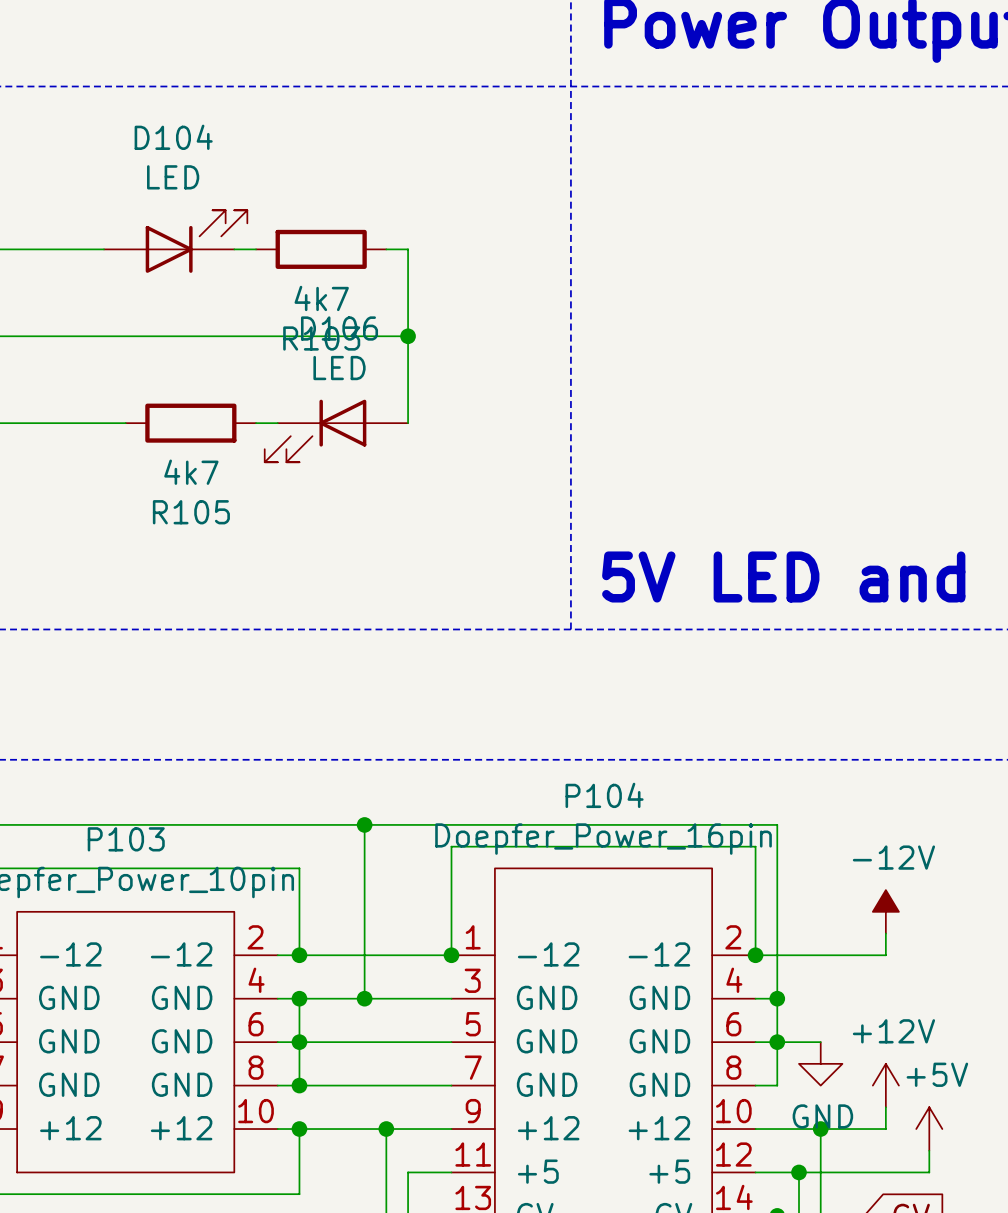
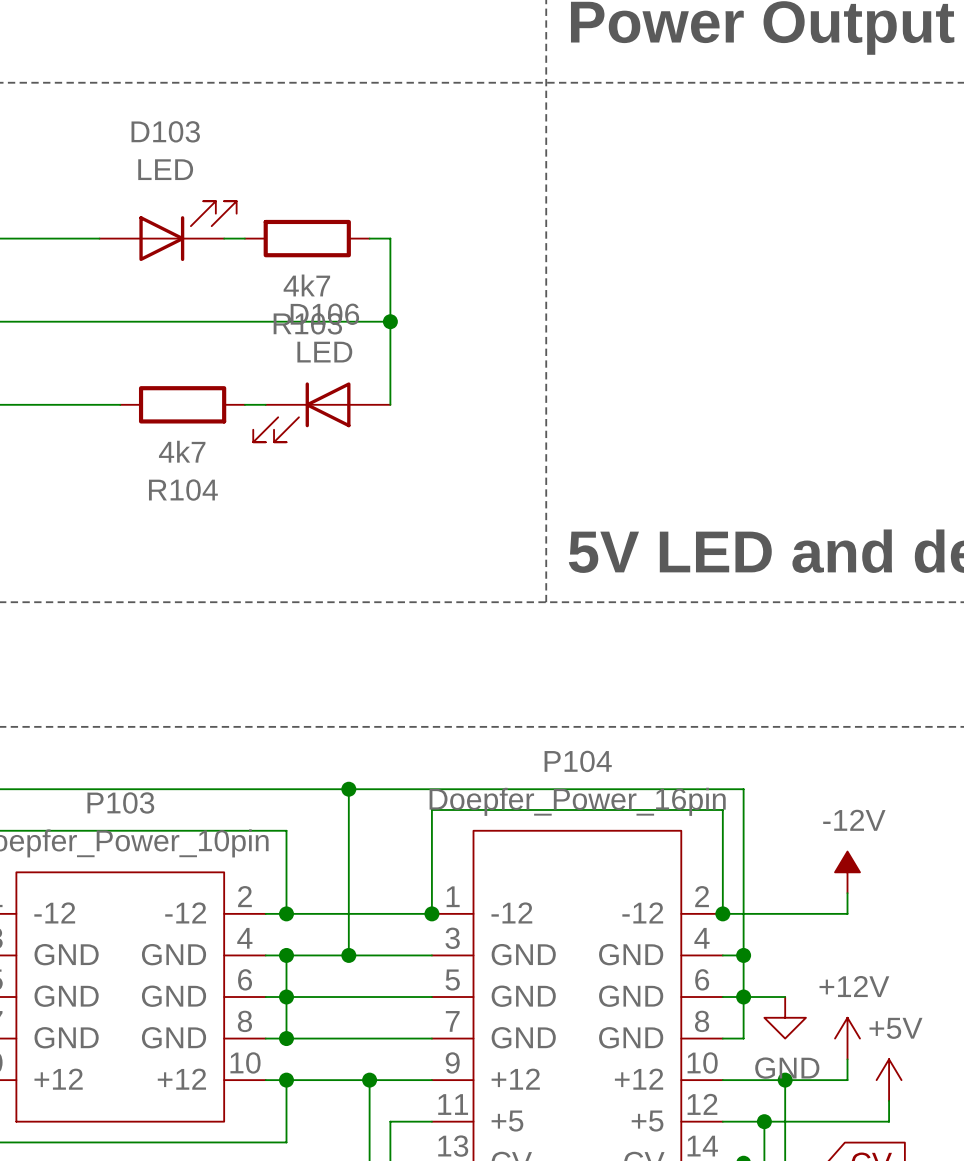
D104 name: D104 (173, 137) -> D103 (165, 131)
R105 name: R105 (191, 512) -> R104 (183, 490)

